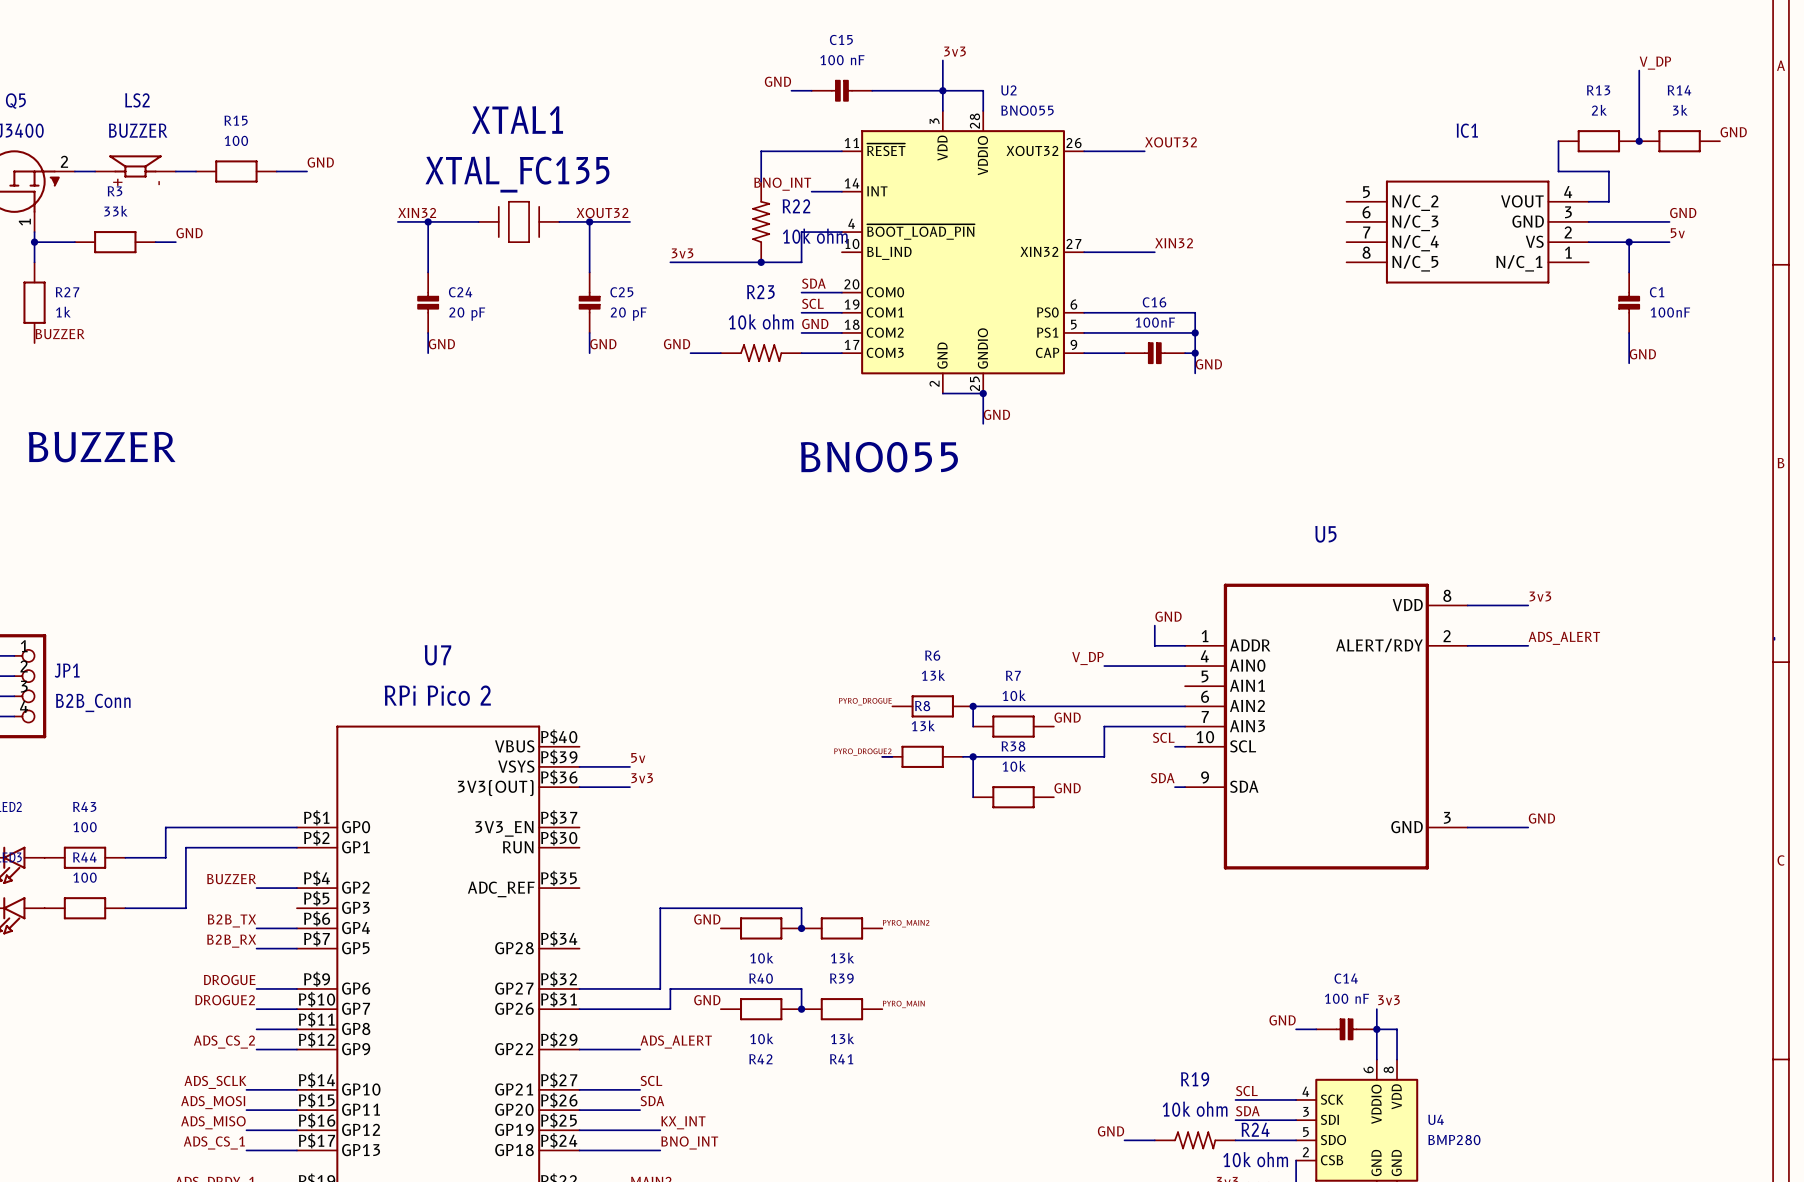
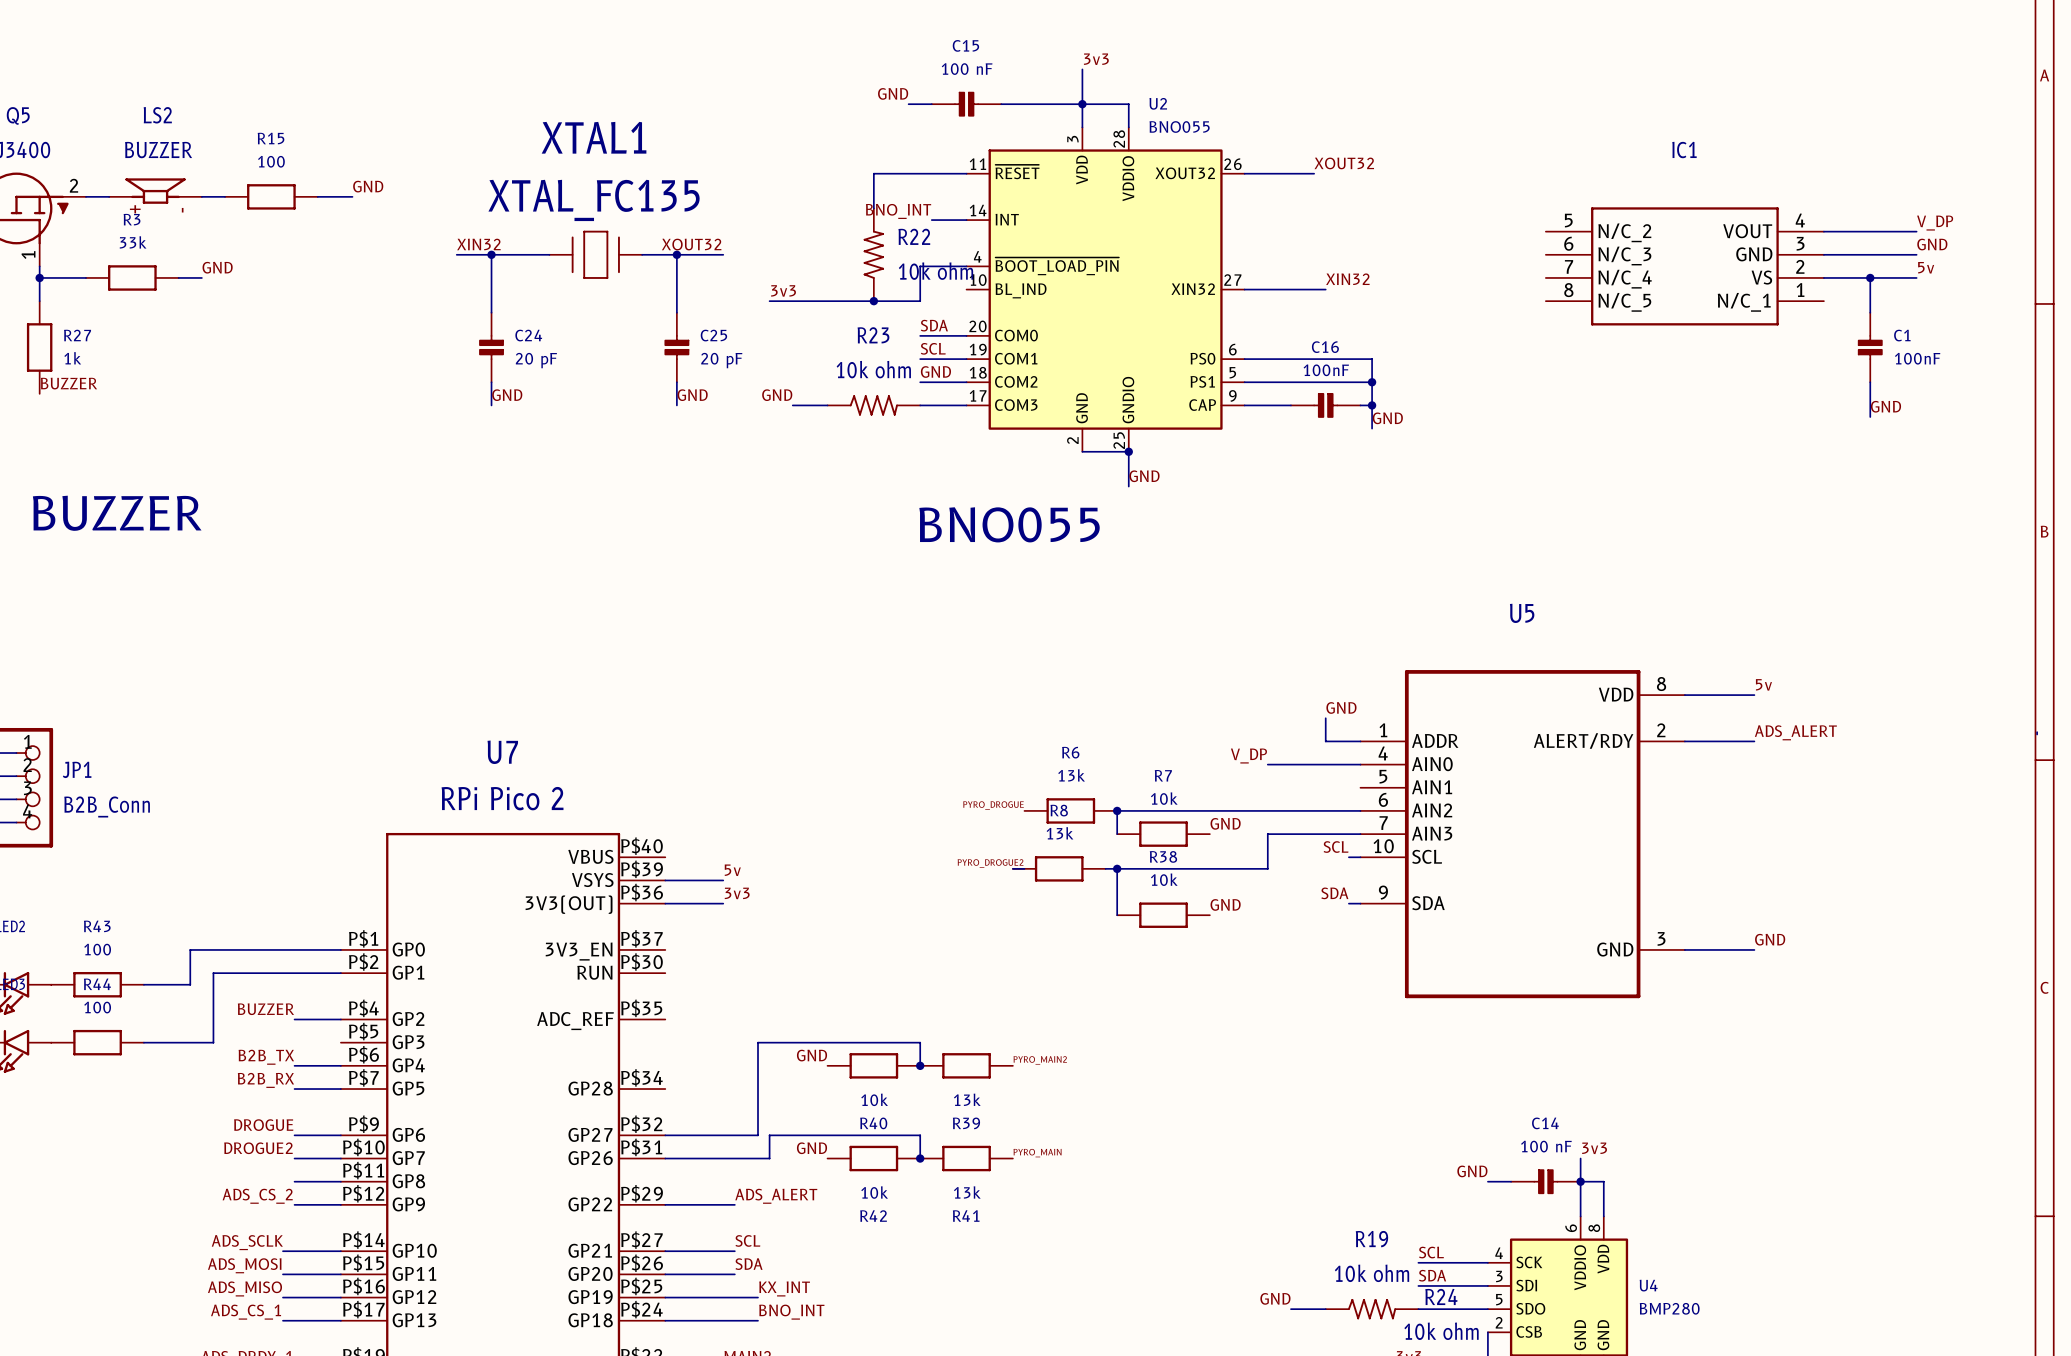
label position: V_DP (1655, 63) -> V_DP (1935, 223)
wire: (1639, 70) (1639, 141) -> none
label: GND (1733, 132) -> none
wire: (1558, 141) (1558, 171) (1608, 171) (1608, 201) -> (1916, 231) (1847, 231)
R13: 2k (1598, 141) -> none
junction: (1639, 141) -> none
R14: 3k (1679, 141) -> none
label: 3v3 (1540, 596) -> 5v (1763, 684)

